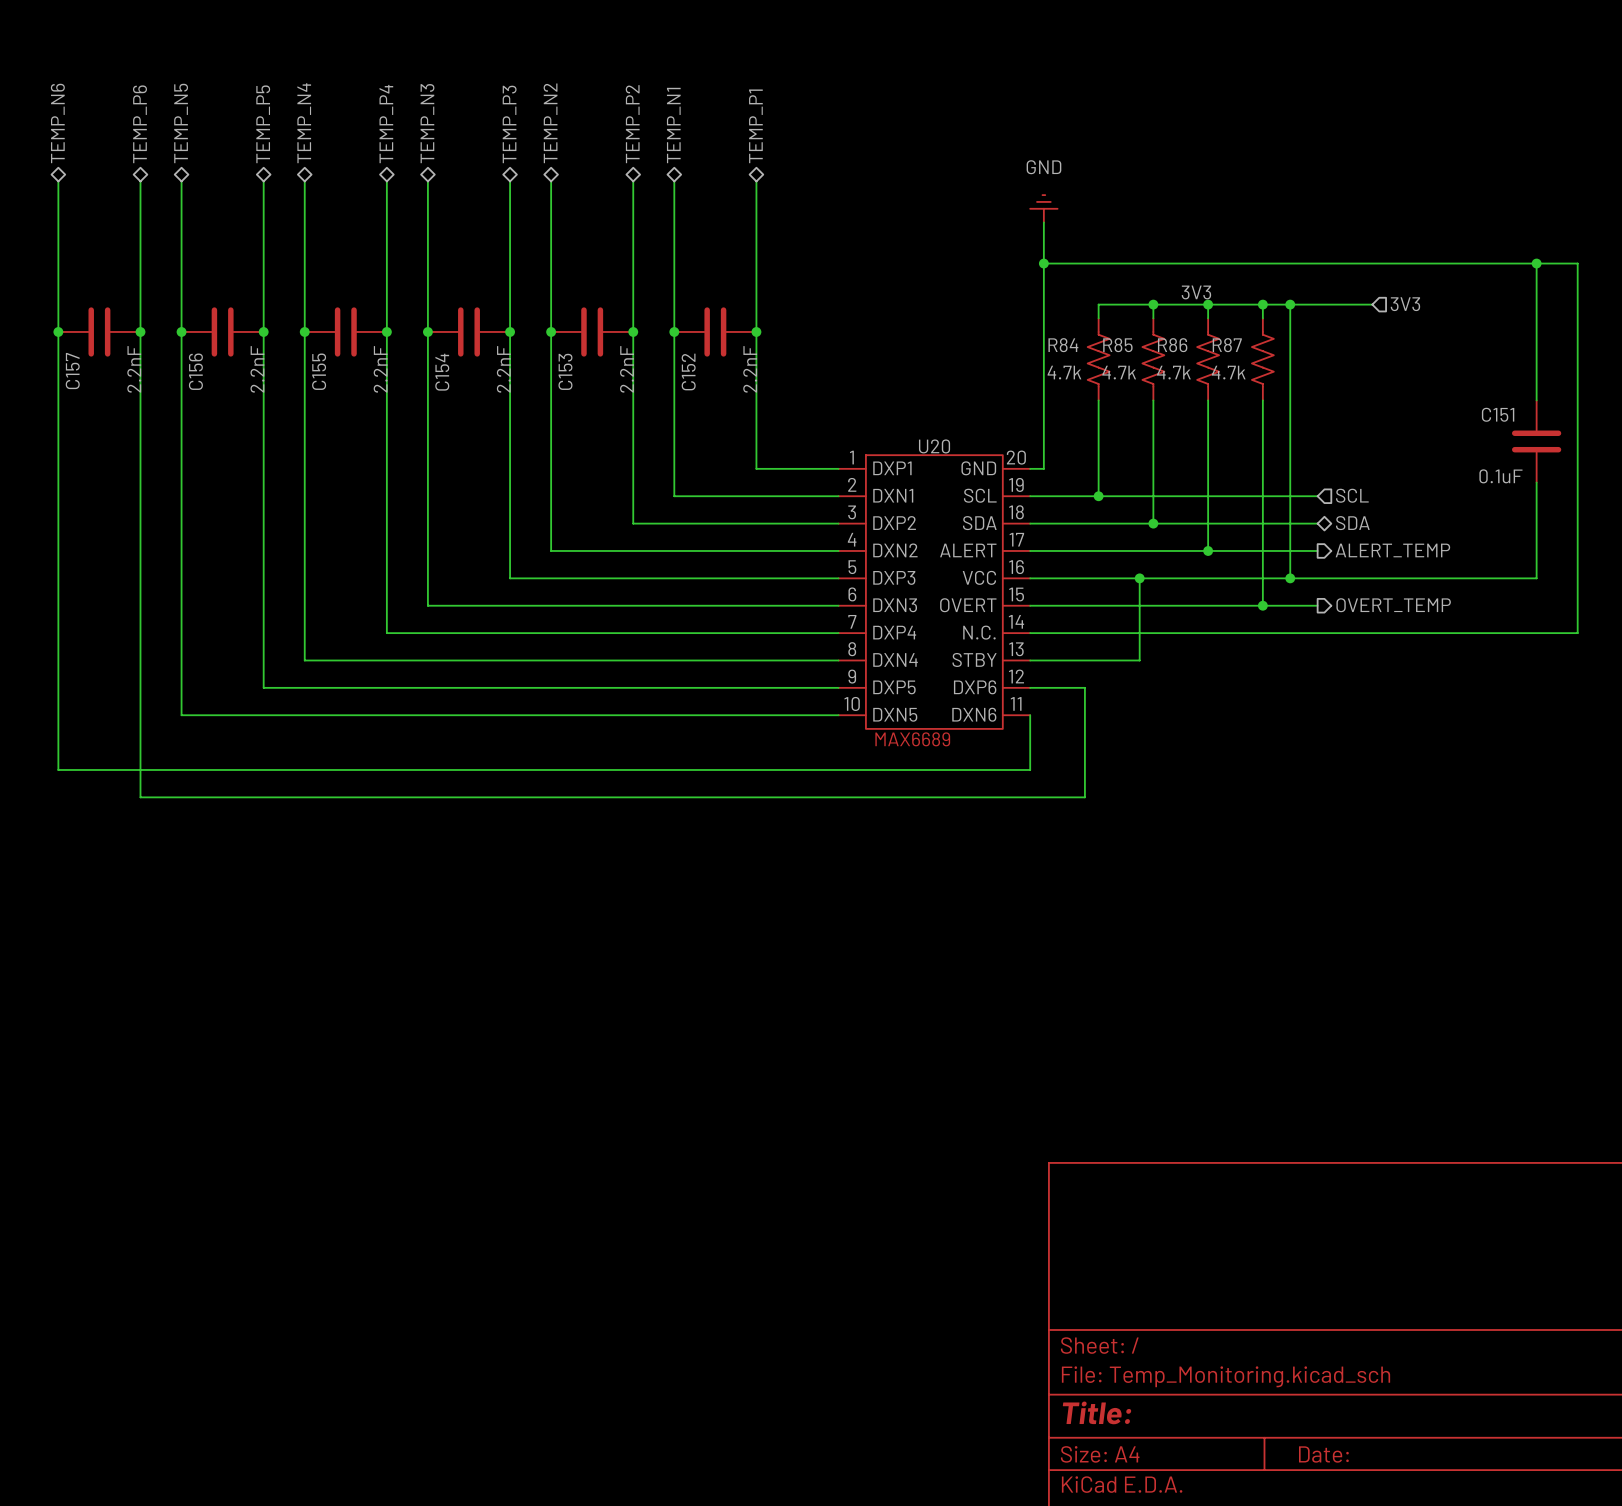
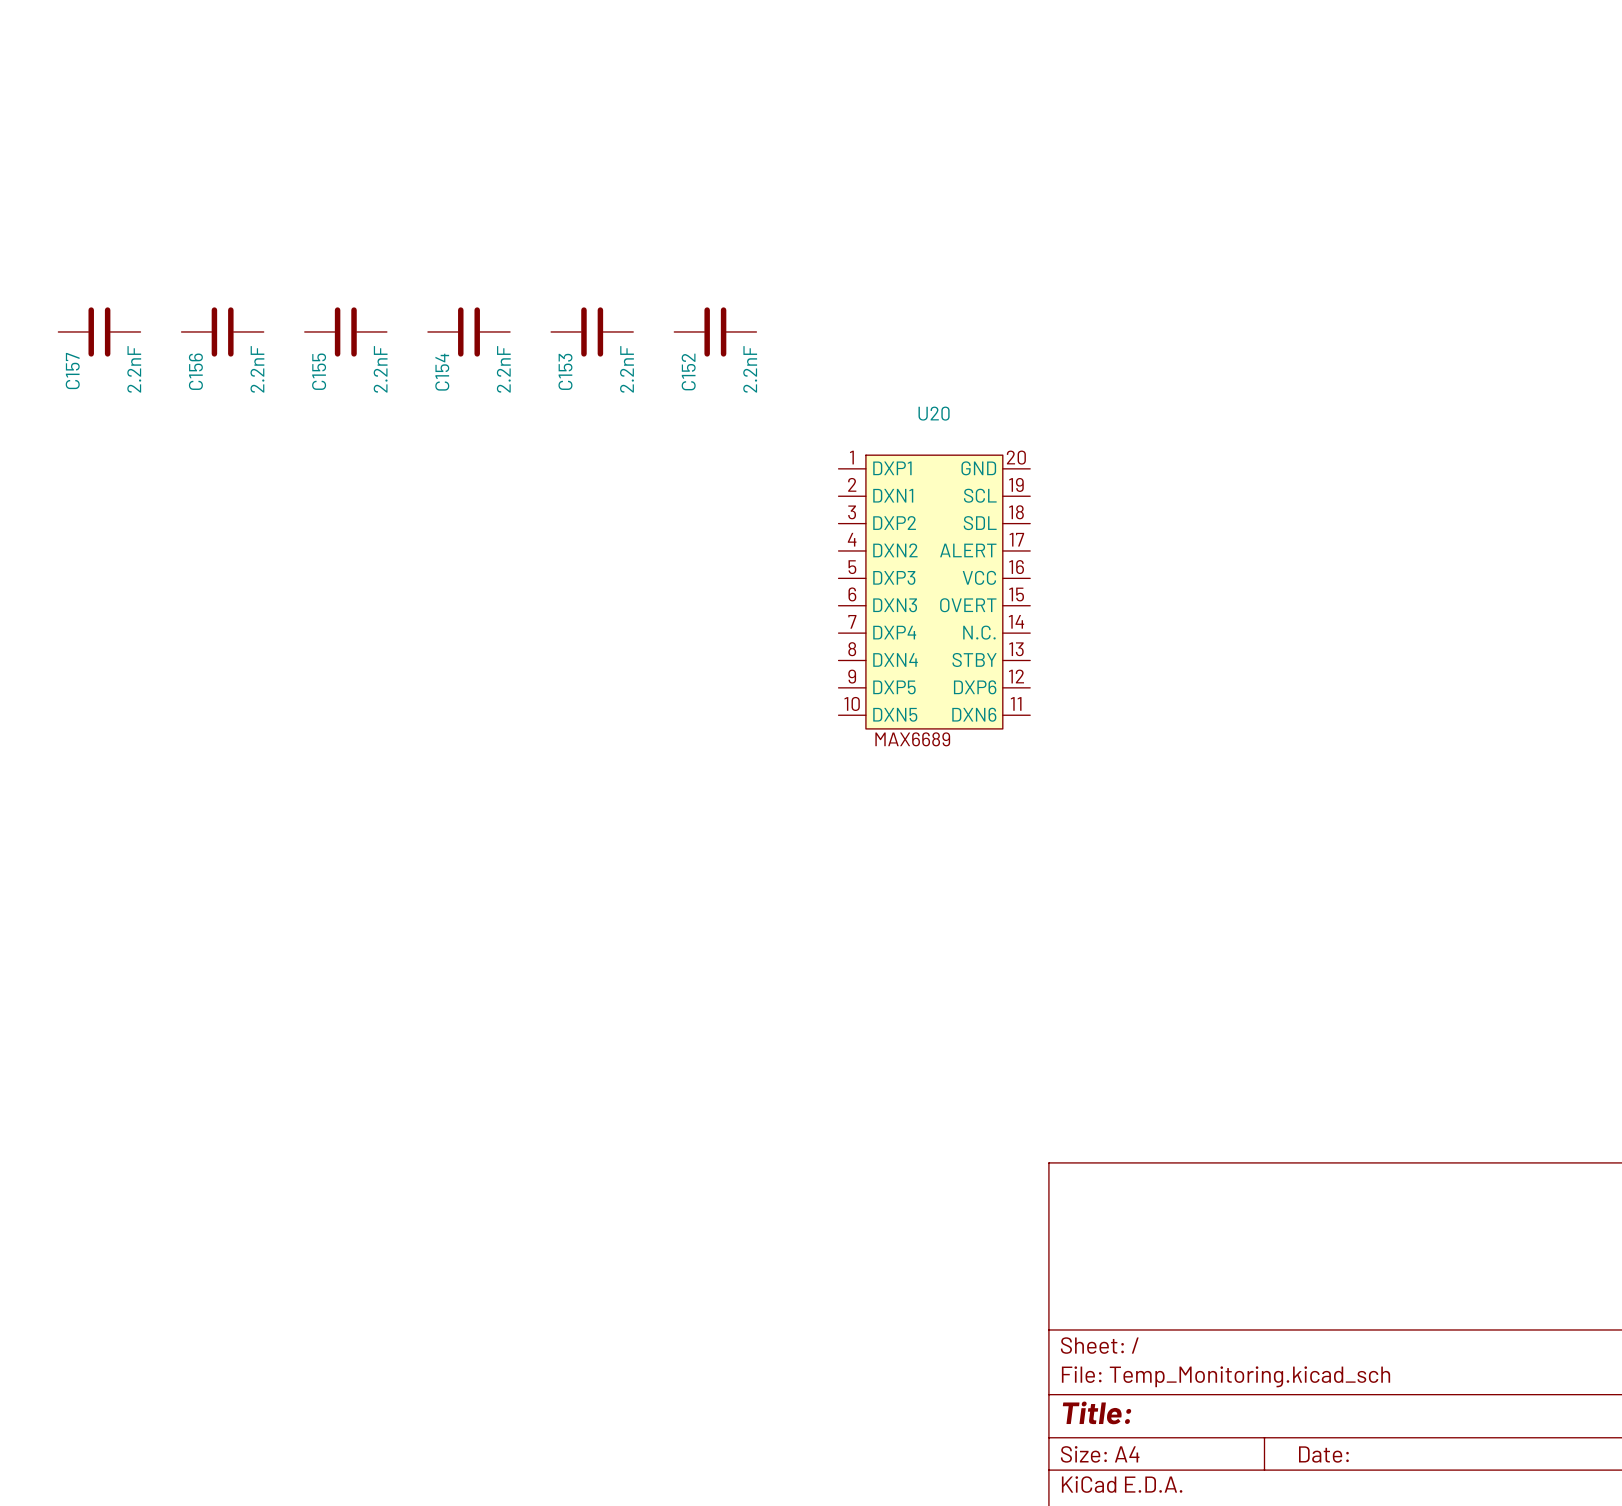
hierarchical label: TEMP_N6 (57, 123) -> none
hierarchical label: TEMP_N5 (181, 123) -> none
hierarchical label: TEMP_N4 (304, 123) -> none
hierarchical label: TEMP_N3 (427, 123) -> none
hierarchical label: TEMP_N2 (550, 123) -> none
hierarchical label: TEMP_P6 (139, 124) -> none
hierarchical label: TEMP_P5 (263, 124) -> none
hierarchical label: TEMP_P4 (386, 124) -> none
hierarchical label: TEMP_P3 (509, 124) -> none
hierarchical label: TEMP_P2 (632, 124) -> none
hierarchical label: TEMP_N1 (673, 125) -> none
hierarchical label: TEMP_P1 (755, 126) -> none
wire: (58, 181) (58, 769) (1030, 769) (1030, 715) -> none
wire: (140, 181) (140, 797) (1084, 797) (1084, 687) (1030, 687) -> none
wire: (181, 181) (181, 715) (838, 715) -> none
wire: (263, 181) (263, 687) (838, 687) -> none
wire: (304, 181) (304, 660) (838, 660) -> none
wire: (386, 181) (386, 633) (838, 633) -> none
wire: (427, 181) (427, 605) (838, 605) -> none
wire: (510, 181) (510, 578) (838, 578) -> none
wire: (551, 181) (551, 550) (838, 550) -> none
wire: (633, 181) (633, 523) (838, 523) -> none
wire: (674, 181) (674, 496) (838, 496) -> none
wire: (756, 181) (756, 468) (838, 468) -> none
power symbol: GND (1043, 208) -> none
wire: (1043, 222) (1043, 468) (1030, 468) -> none
wire: (1043, 263) (1577, 263) (1577, 633) (1030, 633) -> none
junction: (1043, 263) -> none
wire: (1536, 263) (1536, 400) -> none
junction: (1536, 263) -> none
label: 3V3 (1196, 292) -> none
wire: (1153, 304) (1153, 318) -> none
junction: (1153, 304) -> none
wire: (1208, 304) (1208, 318) -> none
junction: (1208, 304) -> none
wire: (1262, 304) (1262, 318) -> none
junction: (1262, 304) -> none
wire: (1290, 304) (1290, 578) -> none
junction: (1290, 304) -> none
wire: (1372, 304) (1098, 304) (1098, 318) -> none
hierarchical label: 3V3 (1405, 304) -> none
junction: (58, 331) -> none
junction: (140, 331) -> none
junction: (181, 331) -> none
junction: (263, 331) -> none
junction: (304, 331) -> none
junction: (386, 331) -> none
junction: (427, 331) -> none
junction: (510, 331) -> none
junction: (551, 331) -> none
junction: (633, 331) -> none
junction: (674, 331) -> none
junction: (756, 331) -> none
R84: 4.7k (1098, 359) -> none
R85: 4.7k (1153, 359) -> none
R86: 4.7k (1208, 359) -> none
R87: 4.7k (1262, 359) -> none
wire: (1098, 400) (1098, 496) -> none
wire: (1153, 400) (1153, 523) -> none
wire: (1208, 400) (1208, 550) -> none
wire: (1262, 400) (1262, 605) -> none
C151: 0.1uF (1536, 441) -> none
U20 name position: U20 (934, 446) -> U20 (934, 413)
wire: (1536, 482) (1536, 578) (1030, 578) -> none
hierarchical label: SCL (1352, 495) -> none
wire: (1030, 496) (1317, 496) -> none
junction: (1098, 496) -> none
U20 pin name: SDA (979, 523) -> SDL (980, 523)
wire: (1030, 523) (1317, 523) -> none
junction: (1153, 523) -> none
hierarchical label: SDA (1352, 523) -> none
wire: (1030, 550) (1317, 550) -> none
junction: (1208, 550) -> none
hierarchical label: ALERT_TEMP (1392, 550) -> none
wire: (1139, 578) (1139, 660) (1030, 660) -> none
junction: (1139, 578) -> none
junction: (1290, 578) -> none
wire: (1030, 605) (1317, 605) -> none
junction: (1262, 605) -> none
hierarchical label: OVERT_TEMP (1393, 605) -> none

